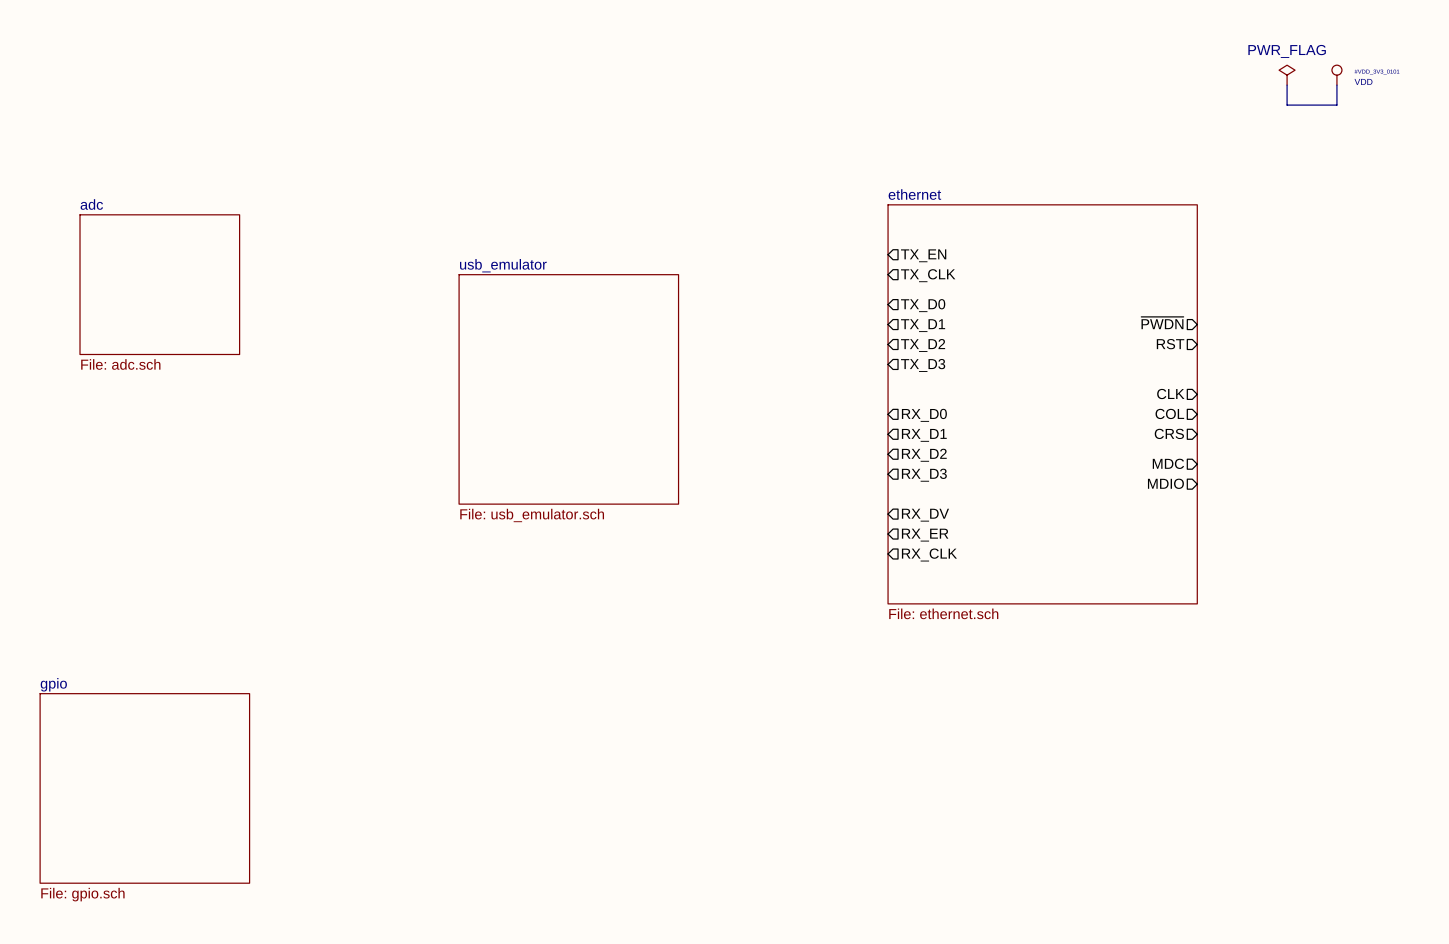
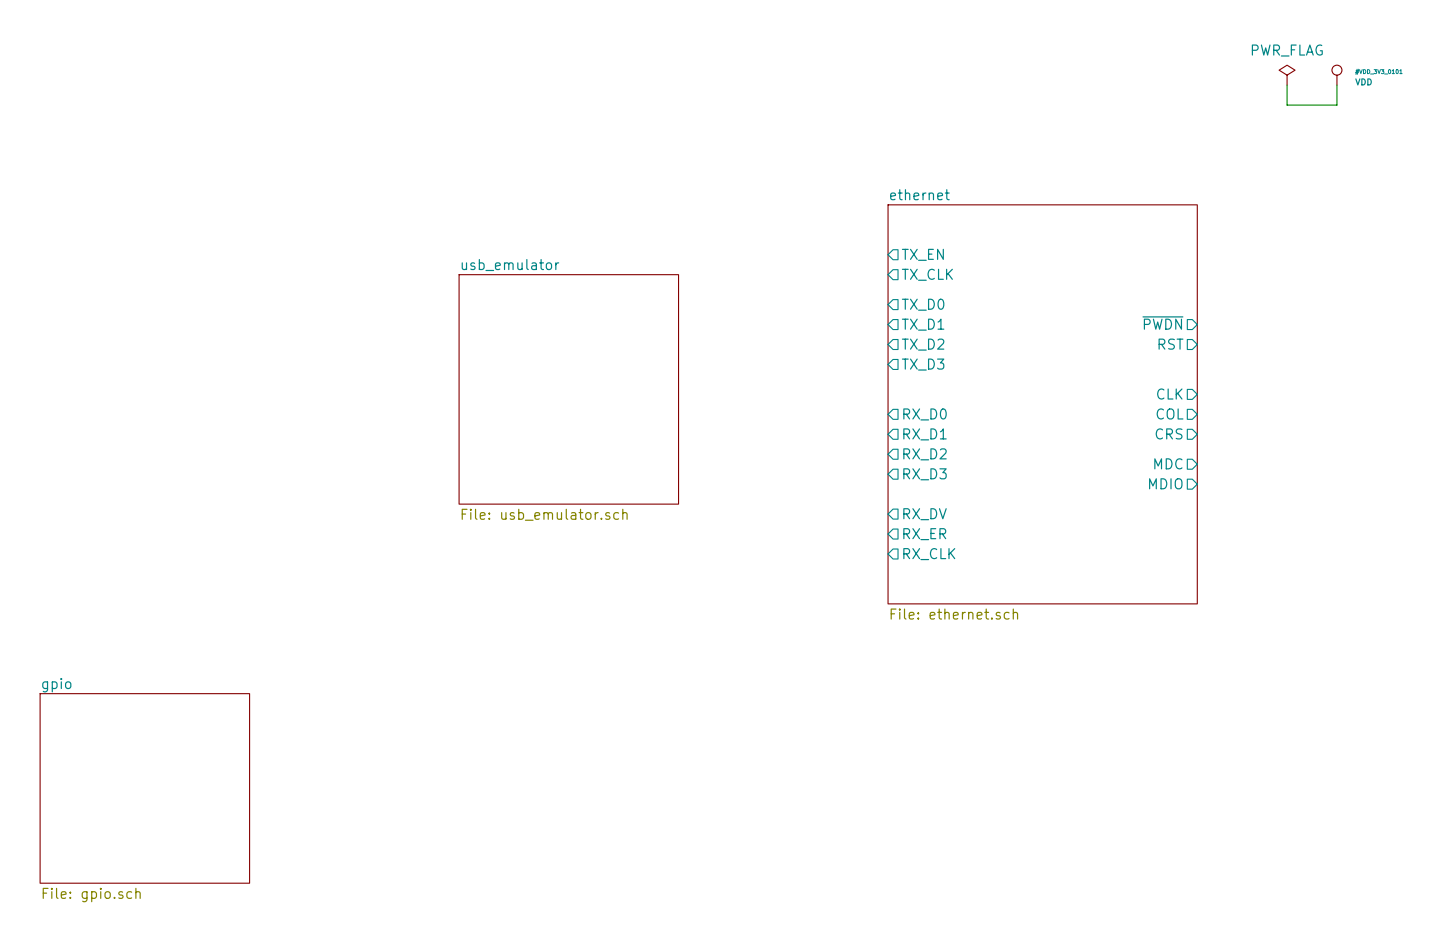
sheet adc: File: adc.sch (159, 284) -> none

